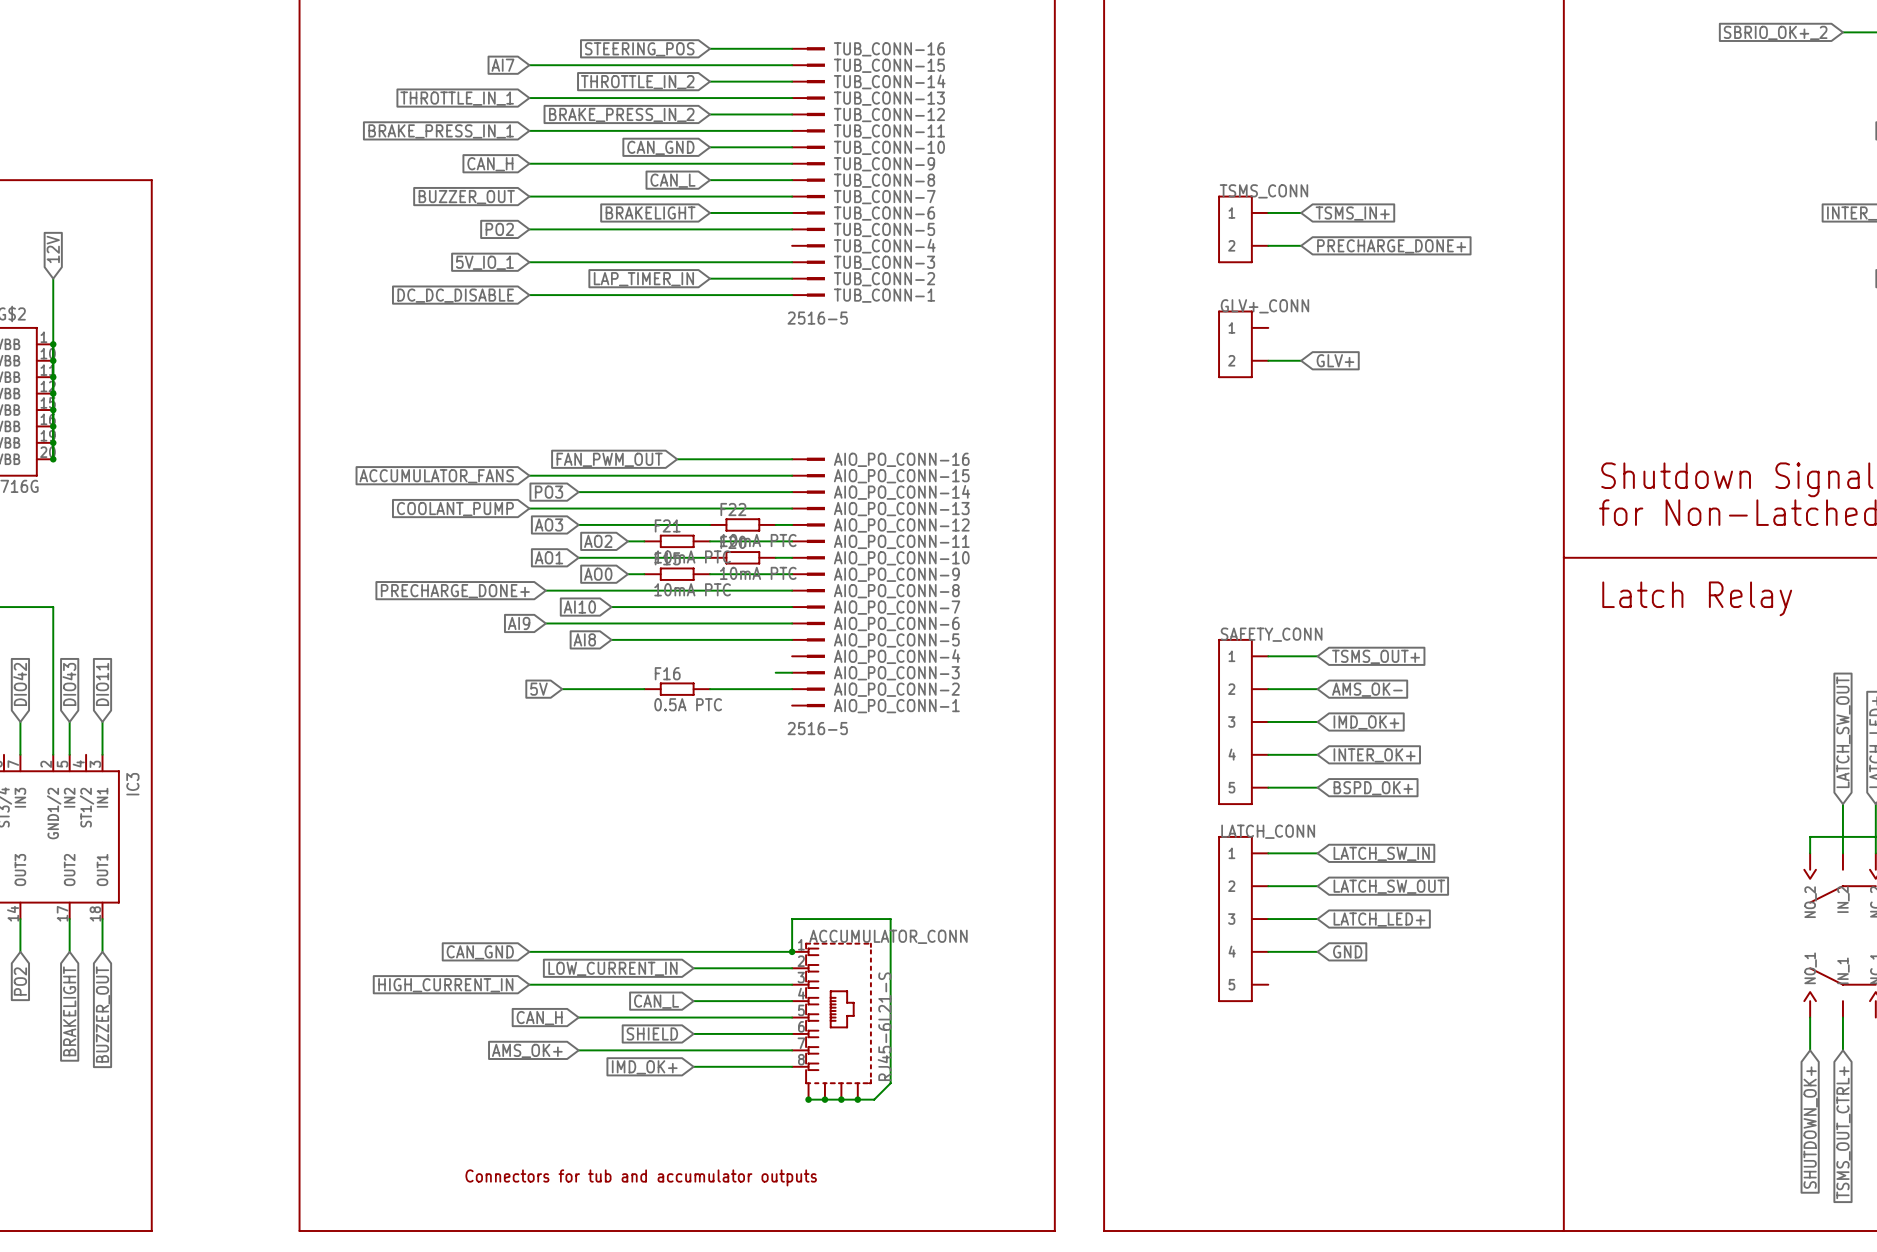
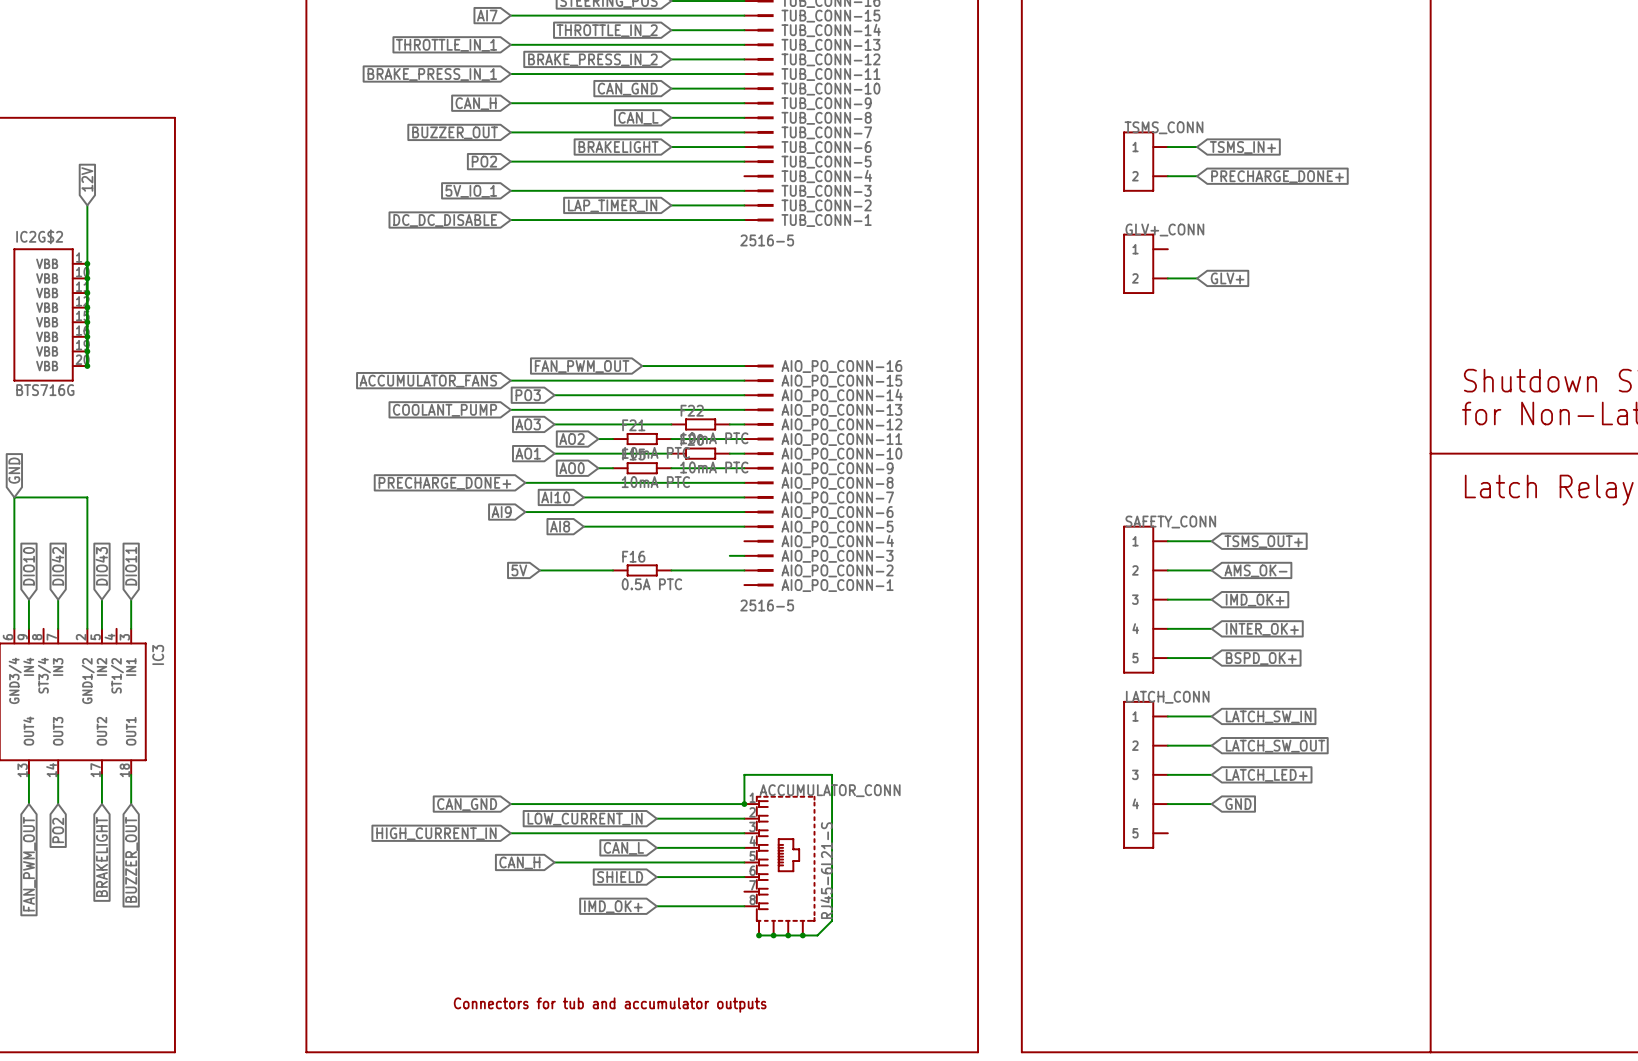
global label: AMS_OK+ (527, 1050) -> none
wire: (578, 1050) (792, 1050) -> none

